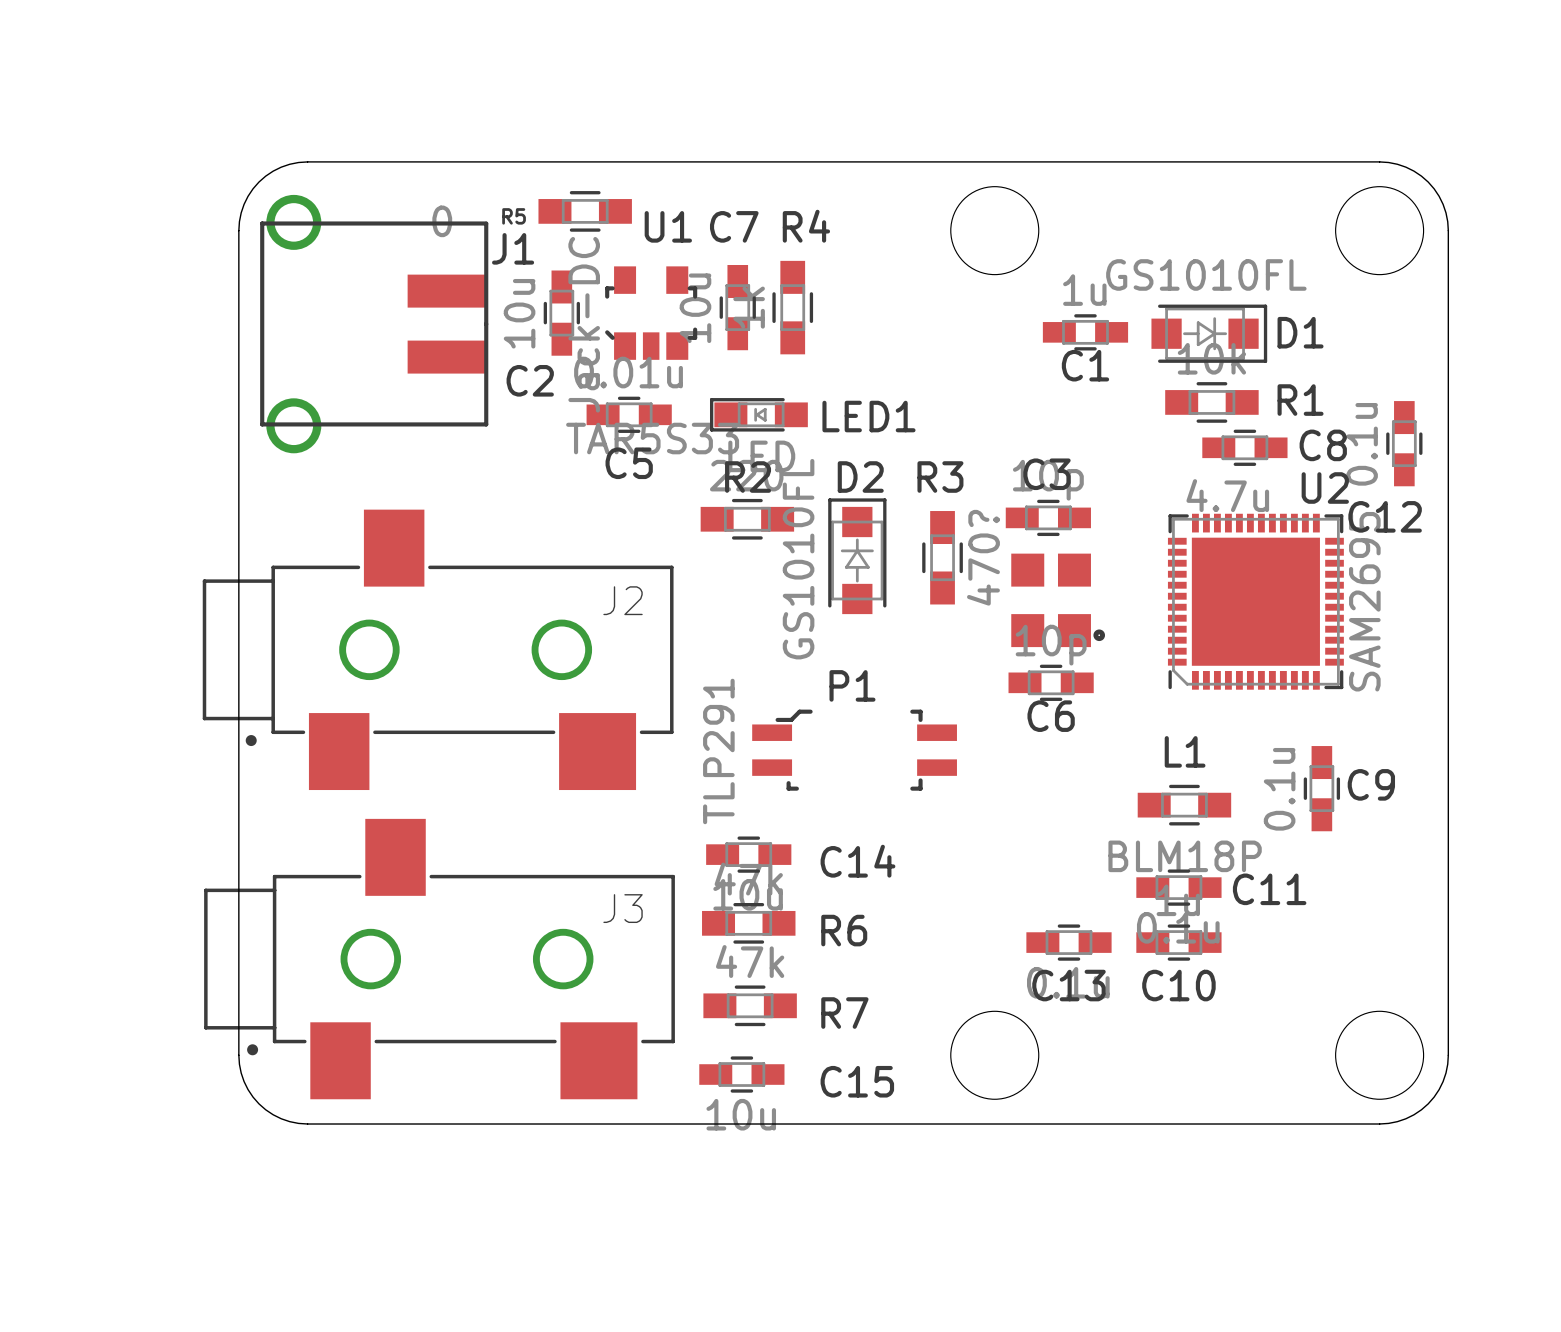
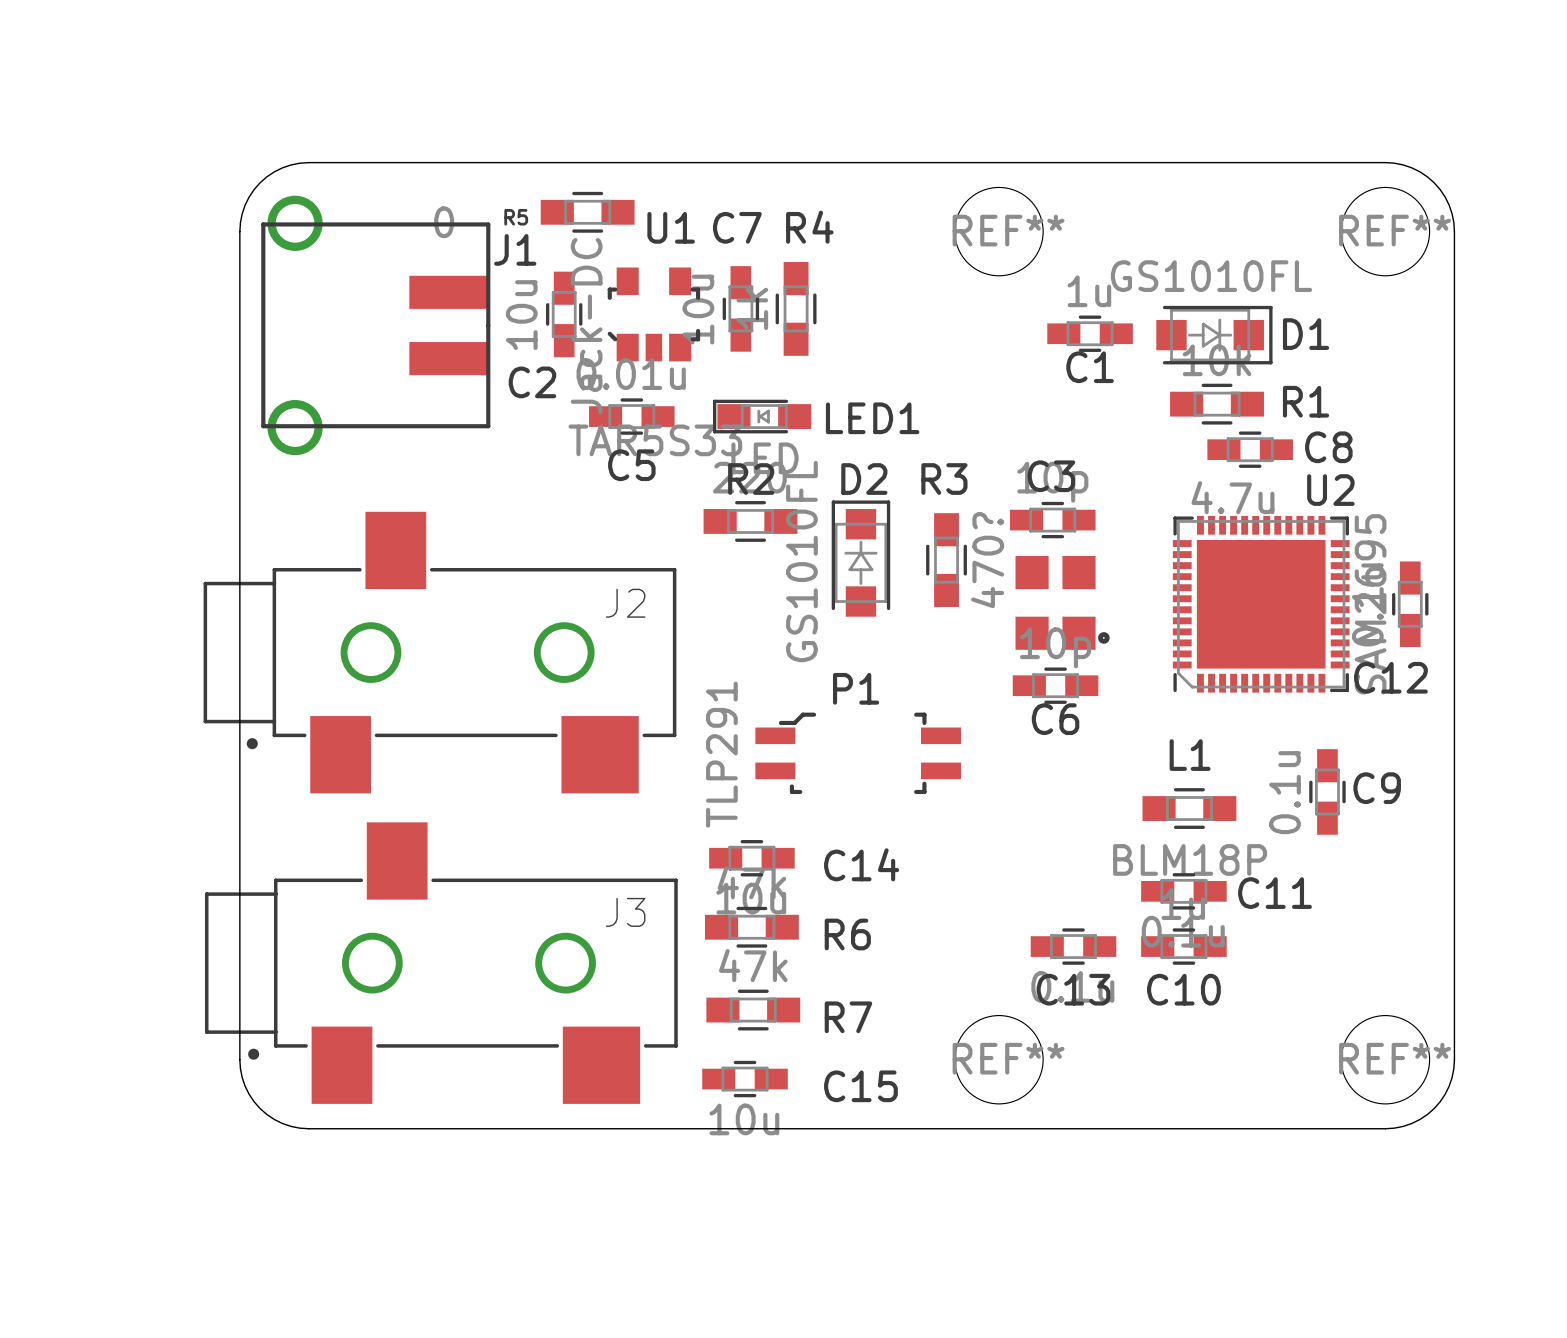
REF** name: none -> REF** (1008, 230)
REF** name: none -> REF** (1395, 230)
C12 position: (1404, 443) -> (1410, 604)
REF** name: none -> REF** (1008, 1058)
REF** name: none -> REF** (1395, 1058)

